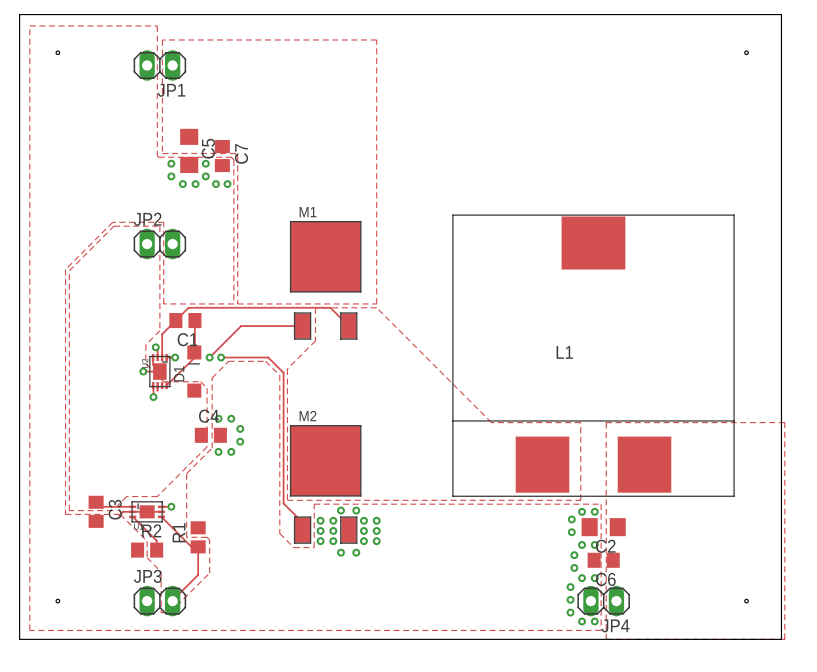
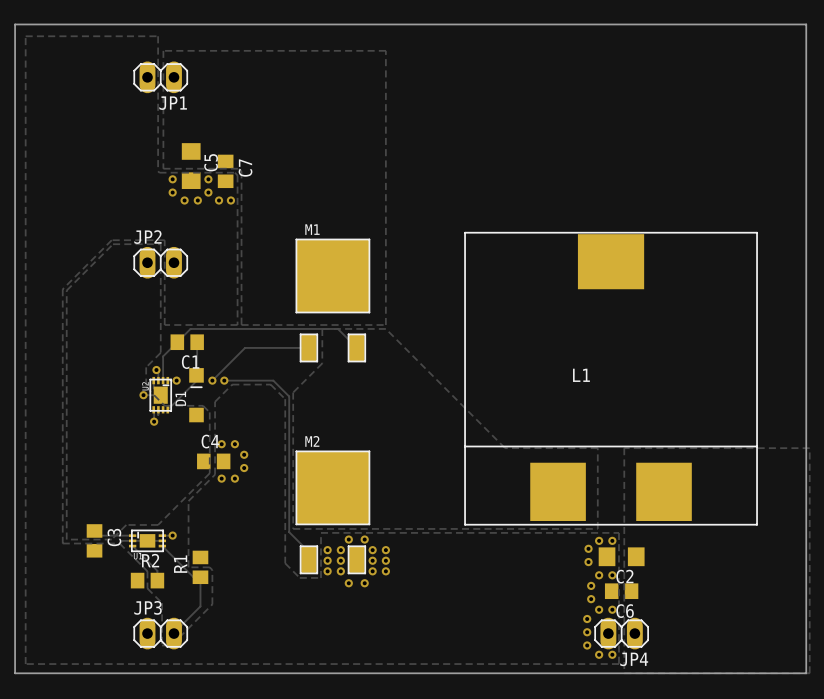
hole: (57, 52) -> none
hole: (746, 52) -> none
hole: (57, 601) -> none
hole: (746, 601) -> none

